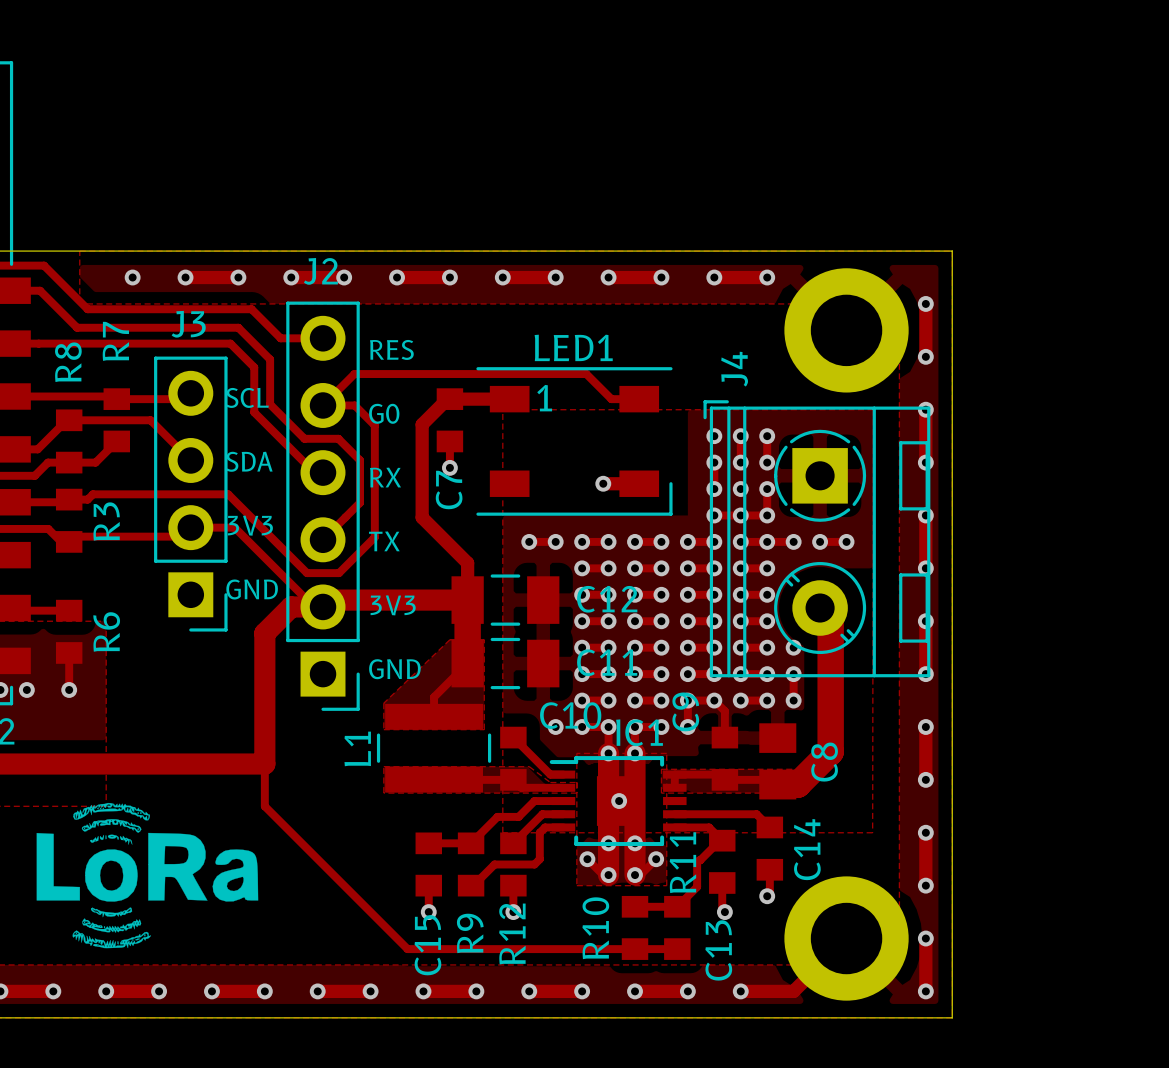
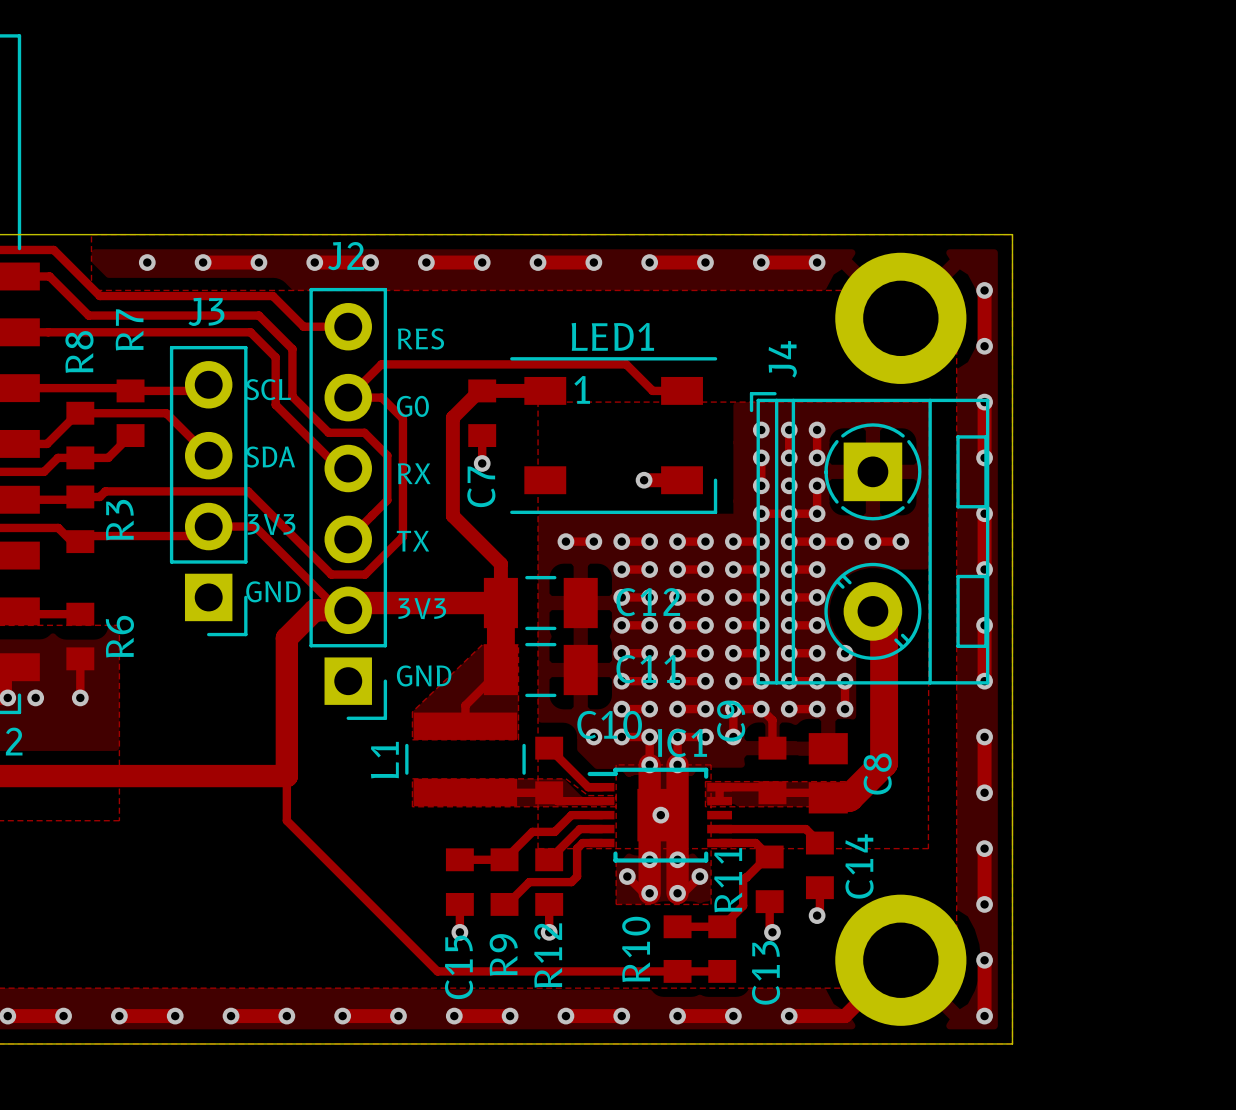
drawing: [36, 802, 259, 949] -> none

